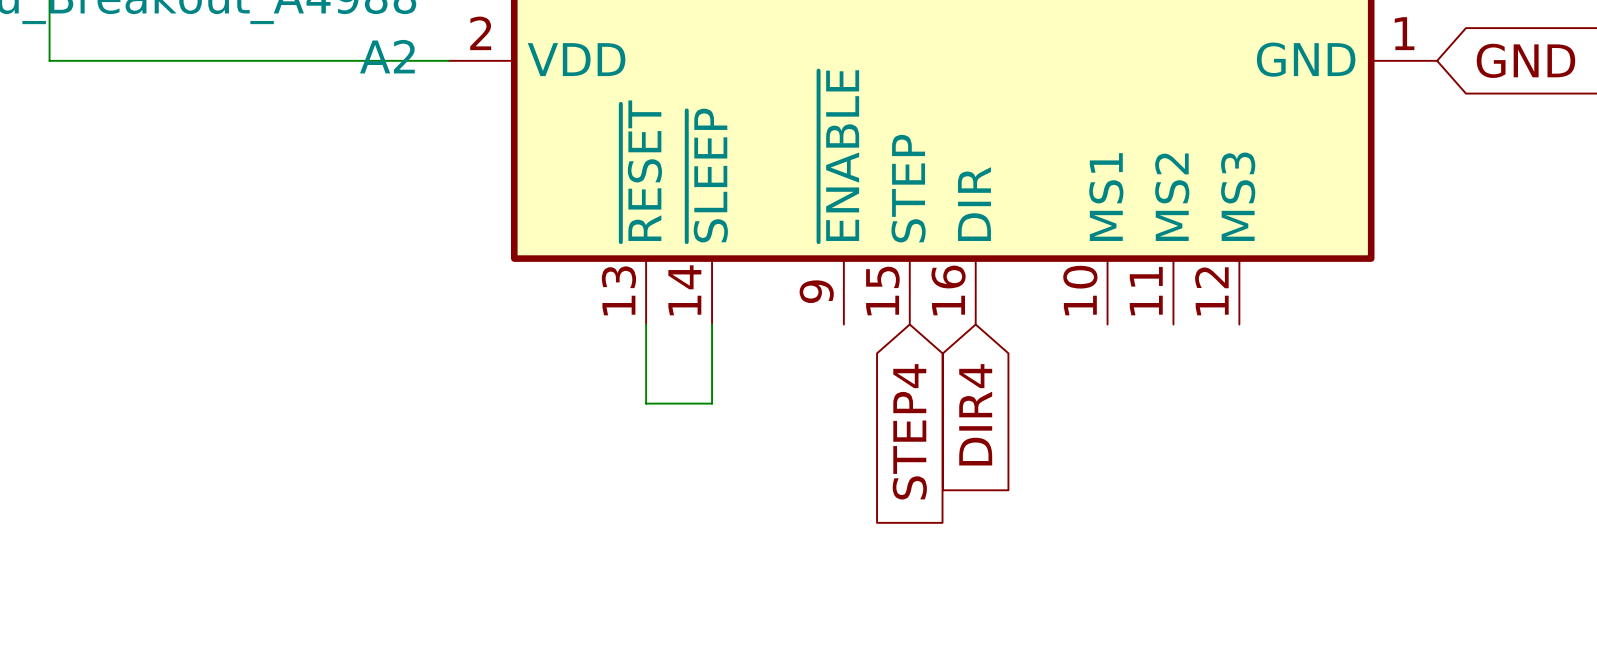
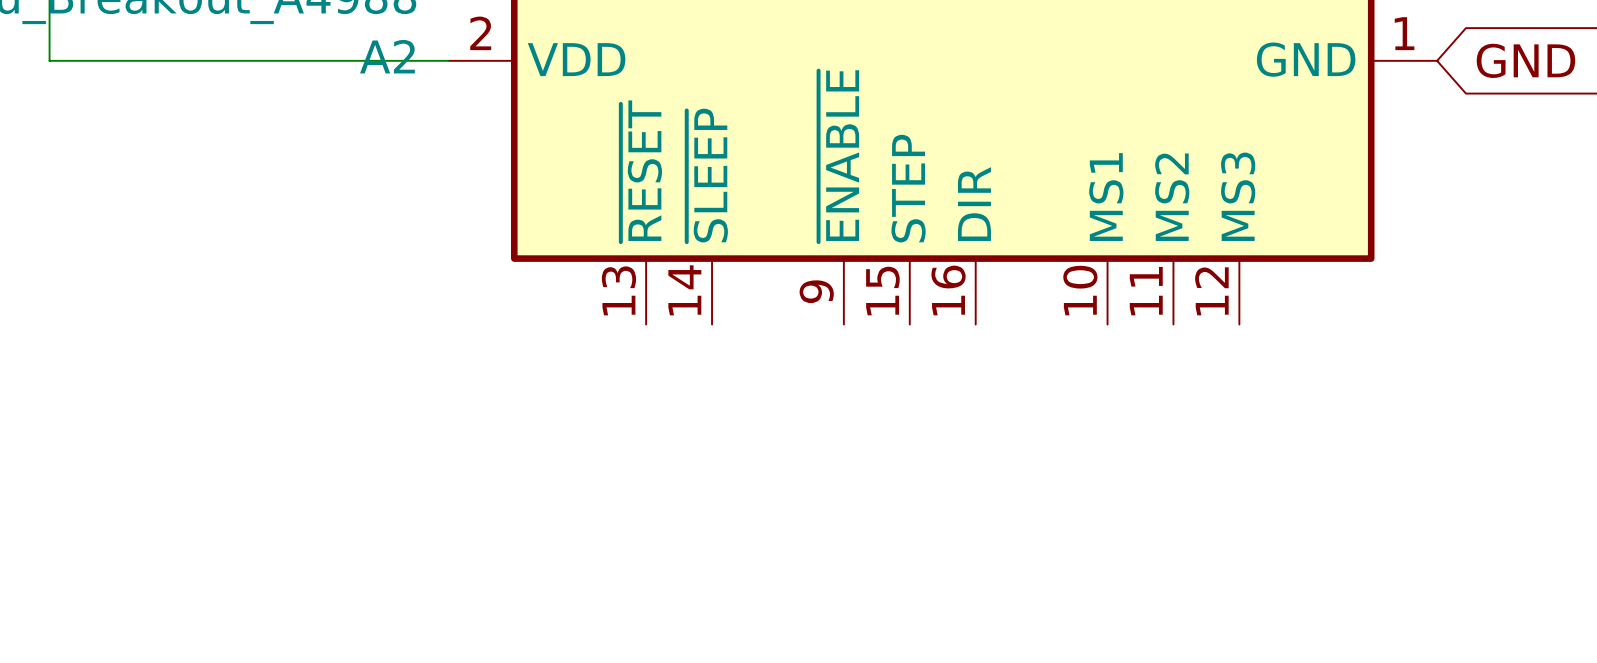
wire: (646, 324) (646, 403) (712, 403) (712, 324) -> none
global label: DIR4 (975, 414) -> none
global label: STEP4 (909, 431) -> none

